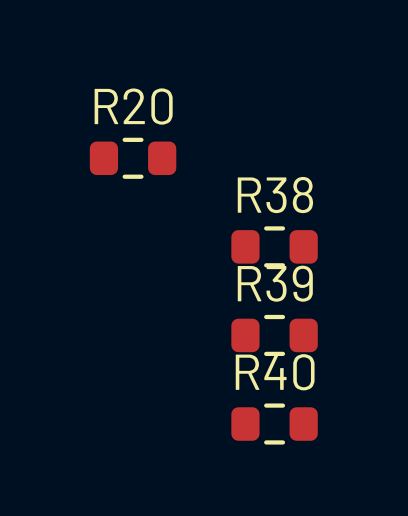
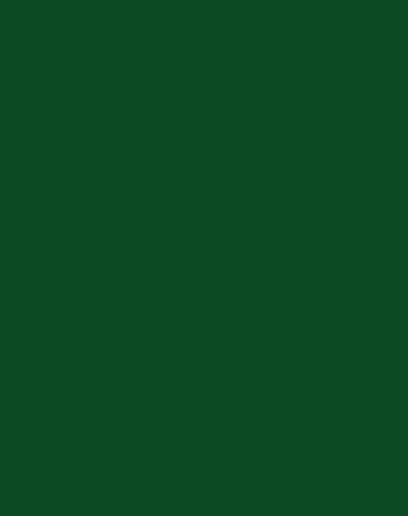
R20: (133, 158) -> none
R38: (274, 246) -> none
R39: (274, 335) -> none
R40: (274, 424) -> none

